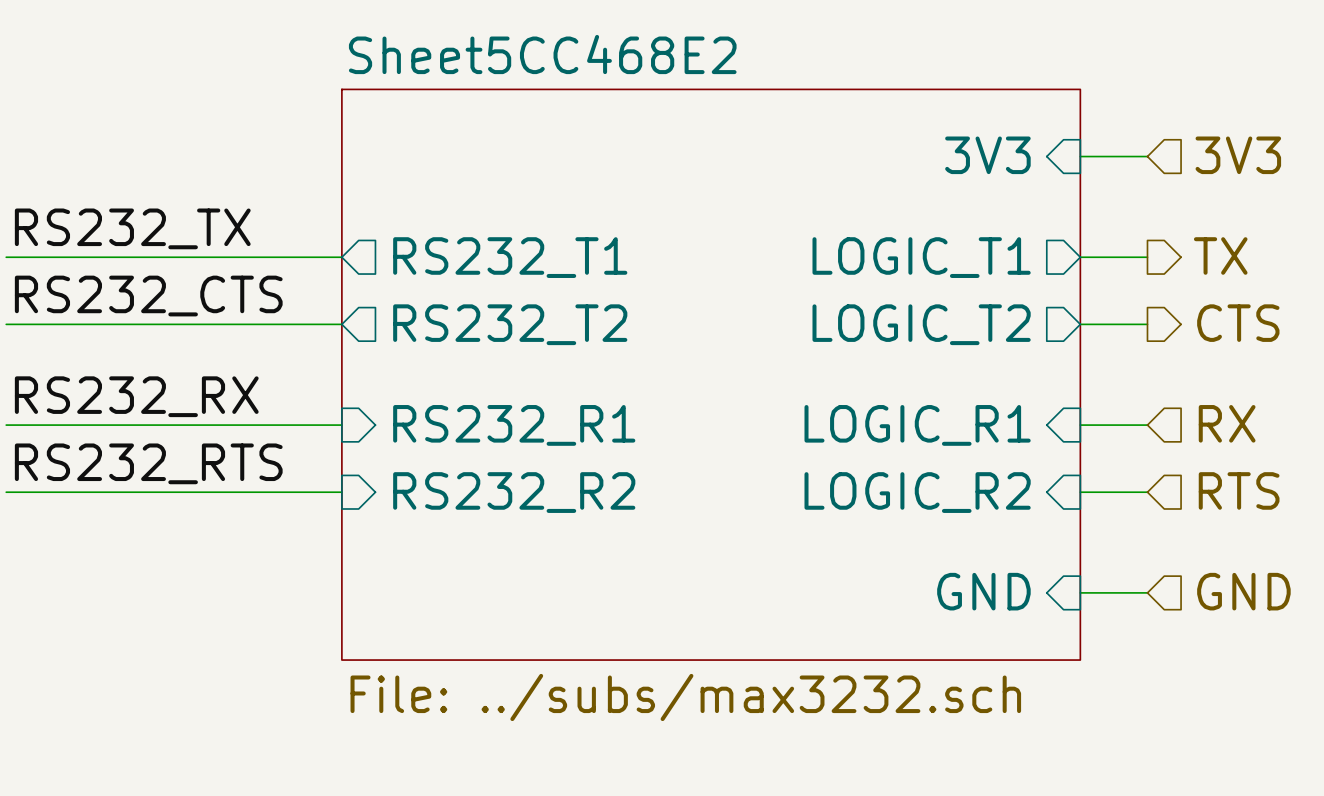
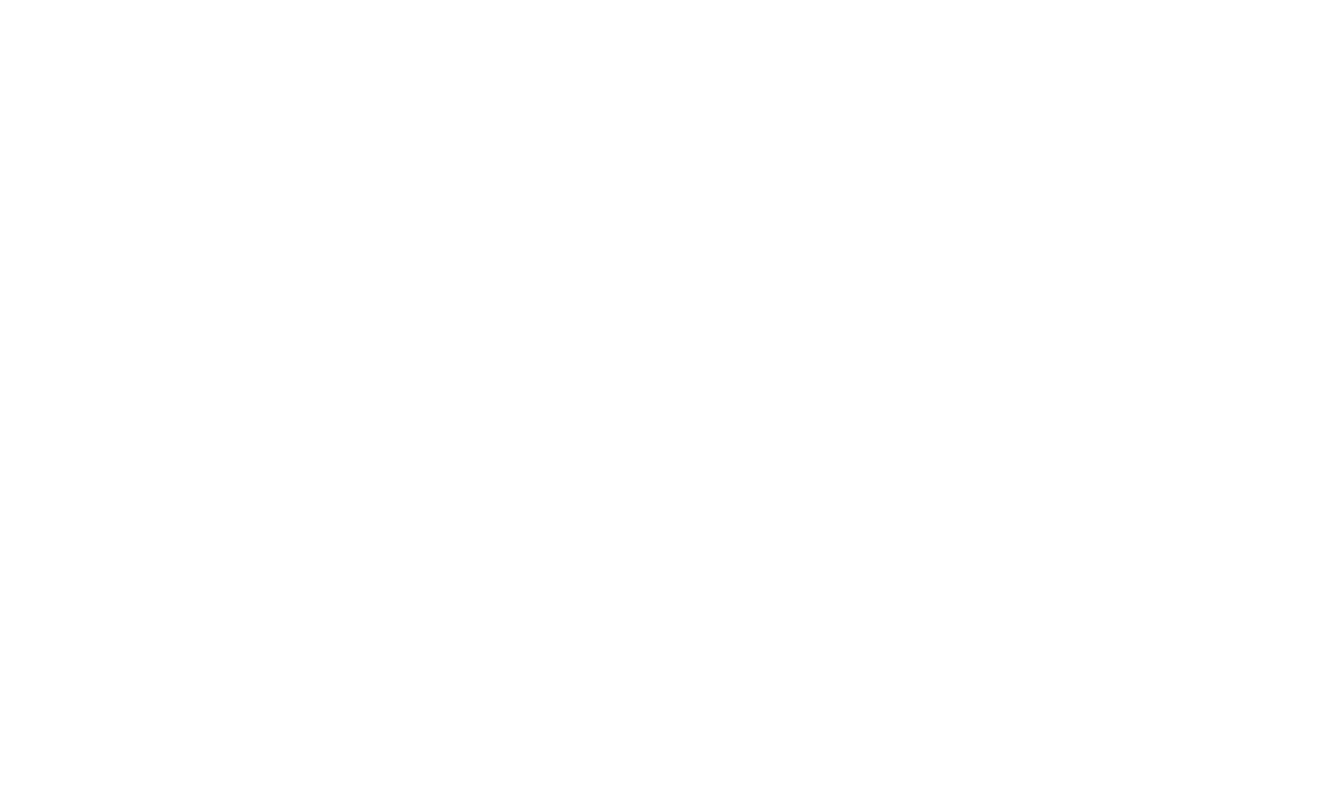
sheet pin: 3V3 (987, 155) -> none
hierarchical label: 3V3 (1238, 155) -> none
wire: (1080, 156) (1147, 156) -> none
label: RS232_TX (132, 228) -> none
hierarchical label: TX (1220, 255) -> none
wire: (6, 257) (341, 257) -> none
sheet pin: RS232_T1 (510, 257) -> none
sheet pin: LOGIC_T1 (921, 257) -> none
wire: (1080, 257) (1147, 257) -> none
label: RS232_CTS (148, 296) -> none
hierarchical label: CTS (1238, 323) -> none
wire: (6, 324) (341, 324) -> none
sheet pin: RS232_T2 (510, 324) -> none
sheet pin: LOGIC_T2 (921, 324) -> none
wire: (1080, 324) (1147, 324) -> none
sheet Sheet5CC468E2: File: ../subs/max3232.sch (711, 374) -> none
label: RS232_RX (136, 396) -> none
hierarchical label: RX (1227, 423) -> none
wire: (6, 425) (341, 425) -> none
sheet pin: RS232_R1 (514, 425) -> none
sheet pin: LOGIC_R1 (917, 425) -> none
wire: (1080, 425) (1147, 425) -> none
label: RS232_RTS (148, 463) -> none
hierarchical label: RTS (1239, 490) -> none
wire: (6, 492) (341, 492) -> none
sheet pin: RS232_R2 (514, 492) -> none
sheet pin: LOGIC_R2 (917, 492) -> none
wire: (1080, 492) (1147, 492) -> none
sheet pin: GND (983, 591) -> none
hierarchical label: GND (1243, 591) -> none
wire: (1080, 592) (1147, 592) -> none

